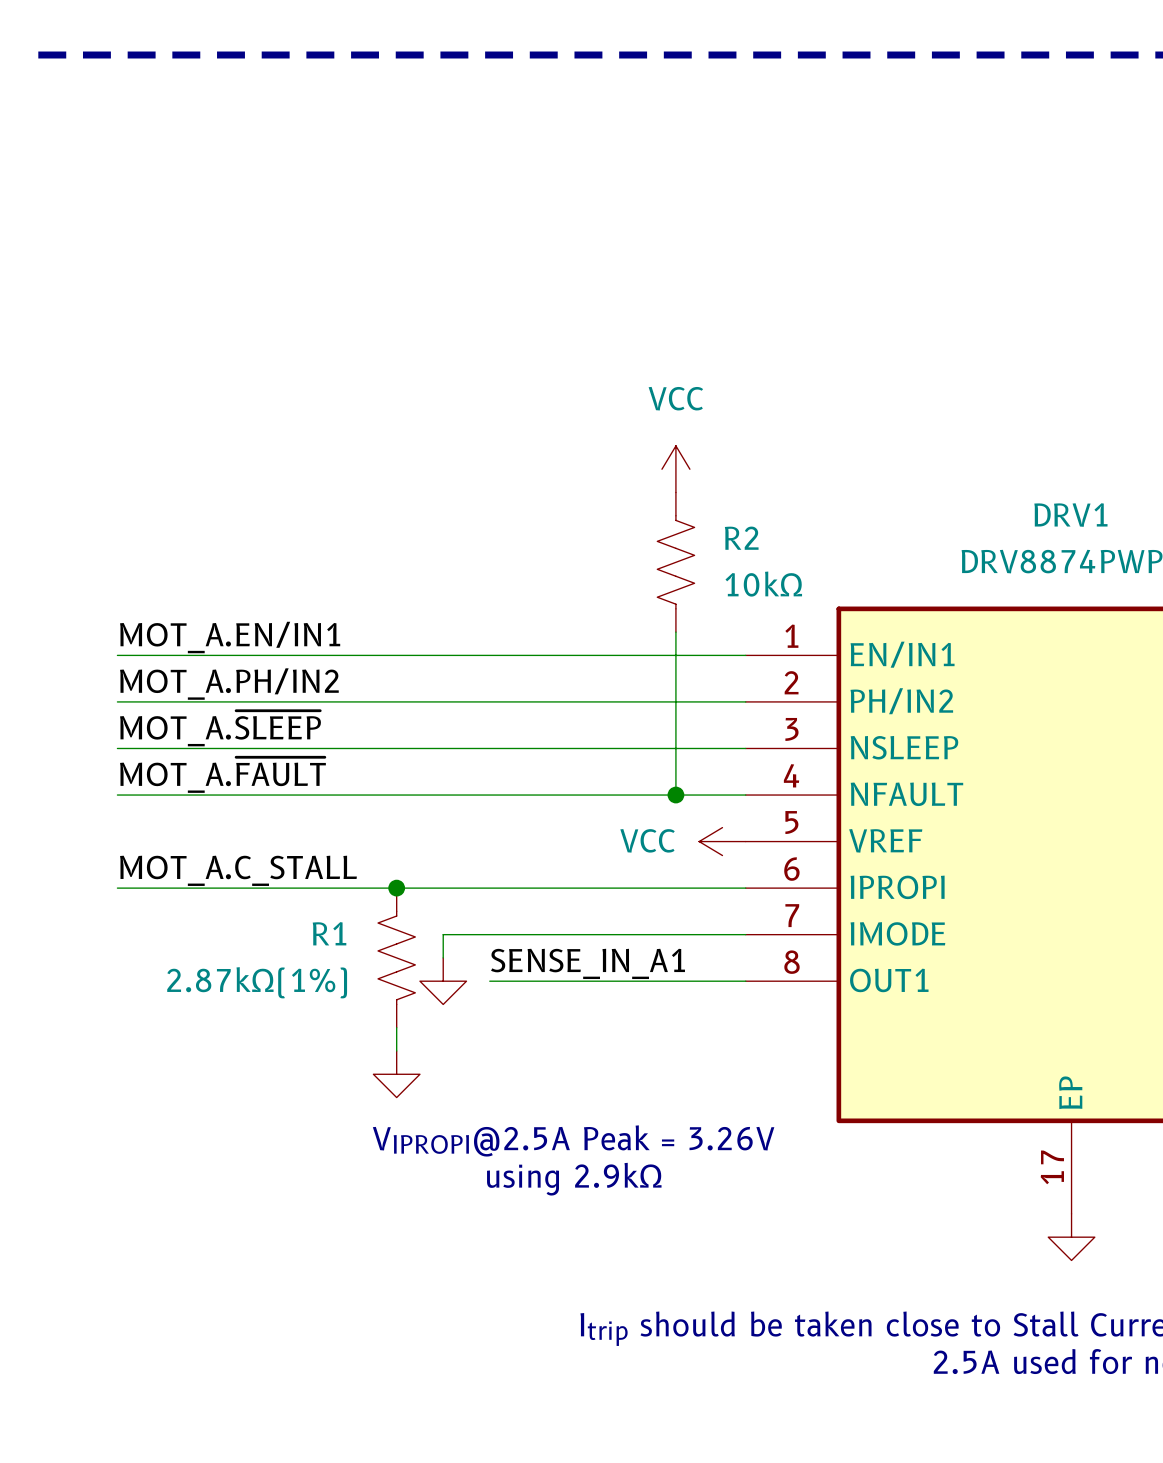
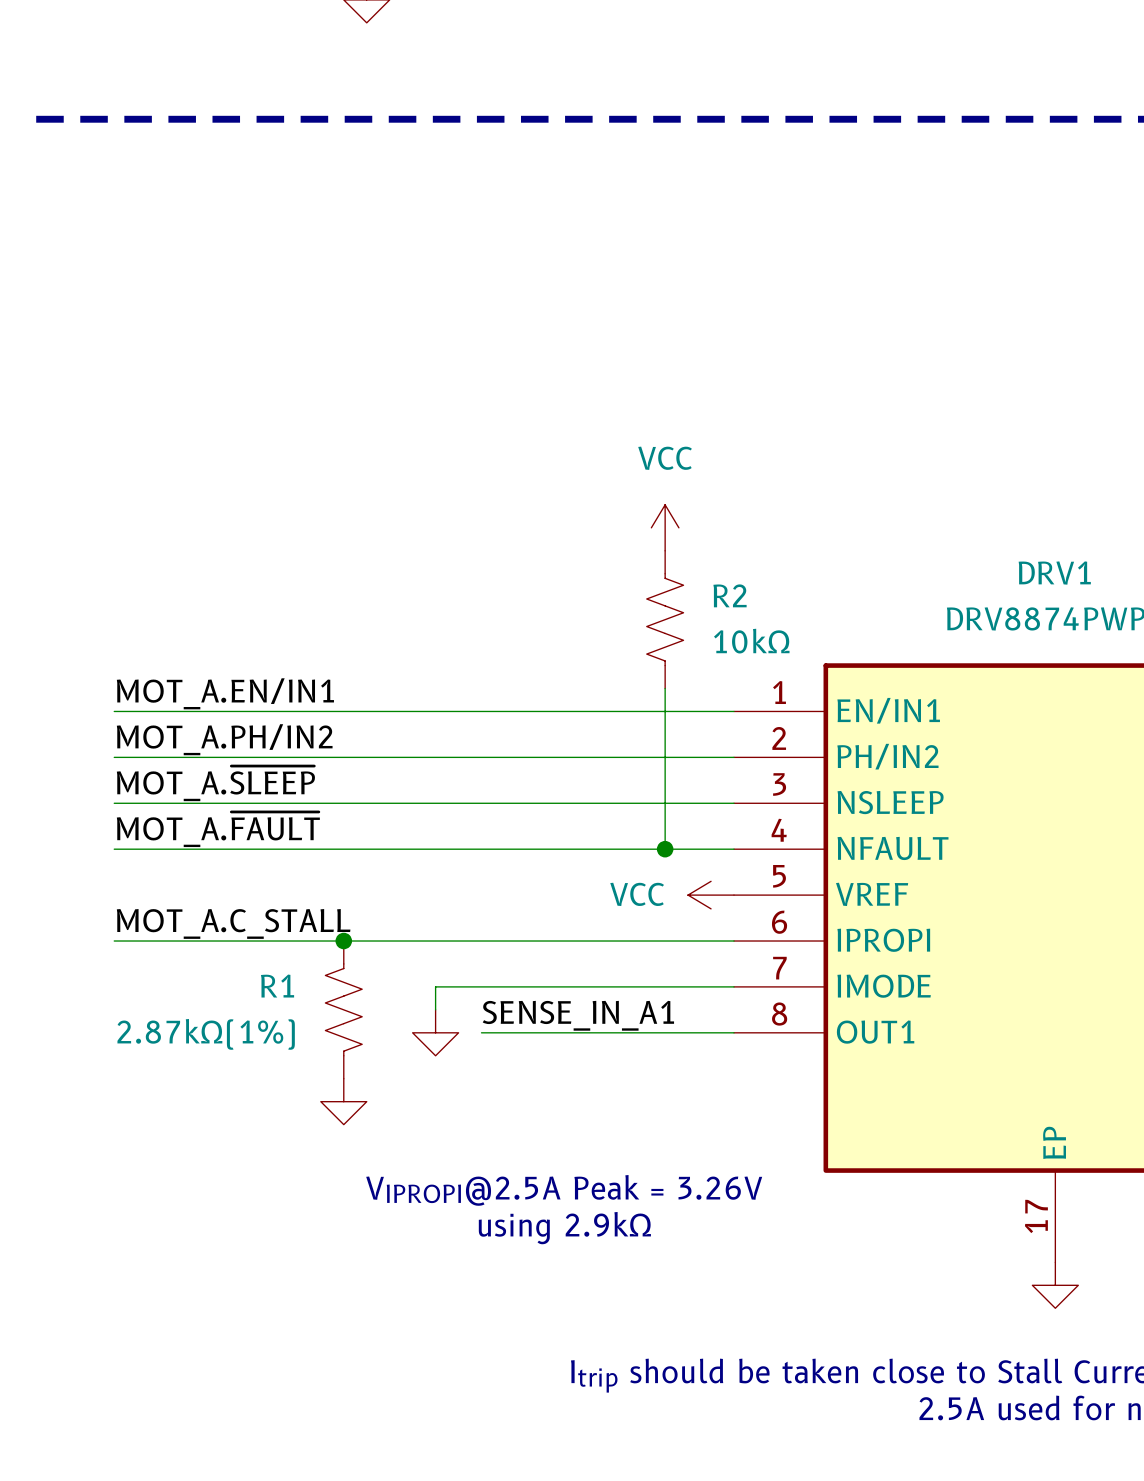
junction position: (396, 888) -> (343, 941)
R1 position: (396, 957) -> (343, 1009)
wire: (396, 1027) (396, 1051) -> none
power symbol position: (396, 1074) -> (343, 1101)

